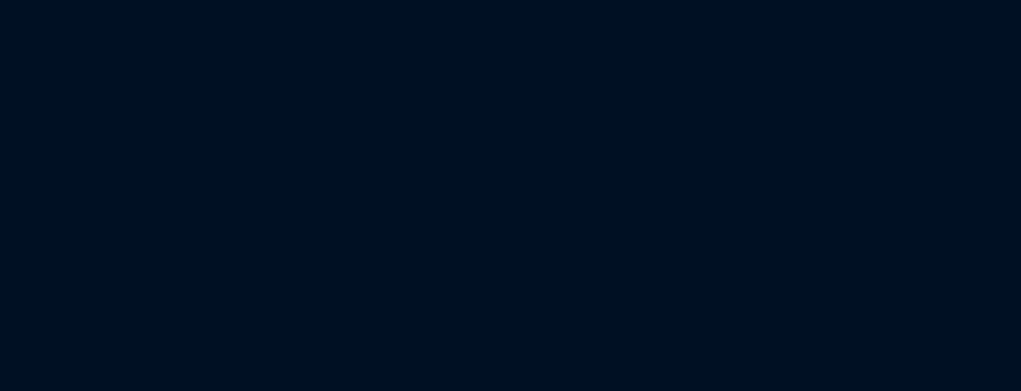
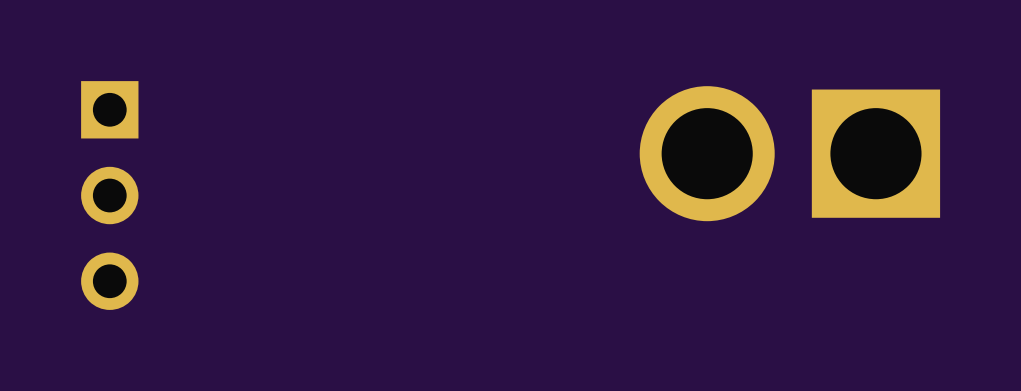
part: none -> (789, 153)
part: none -> (109, 195)

